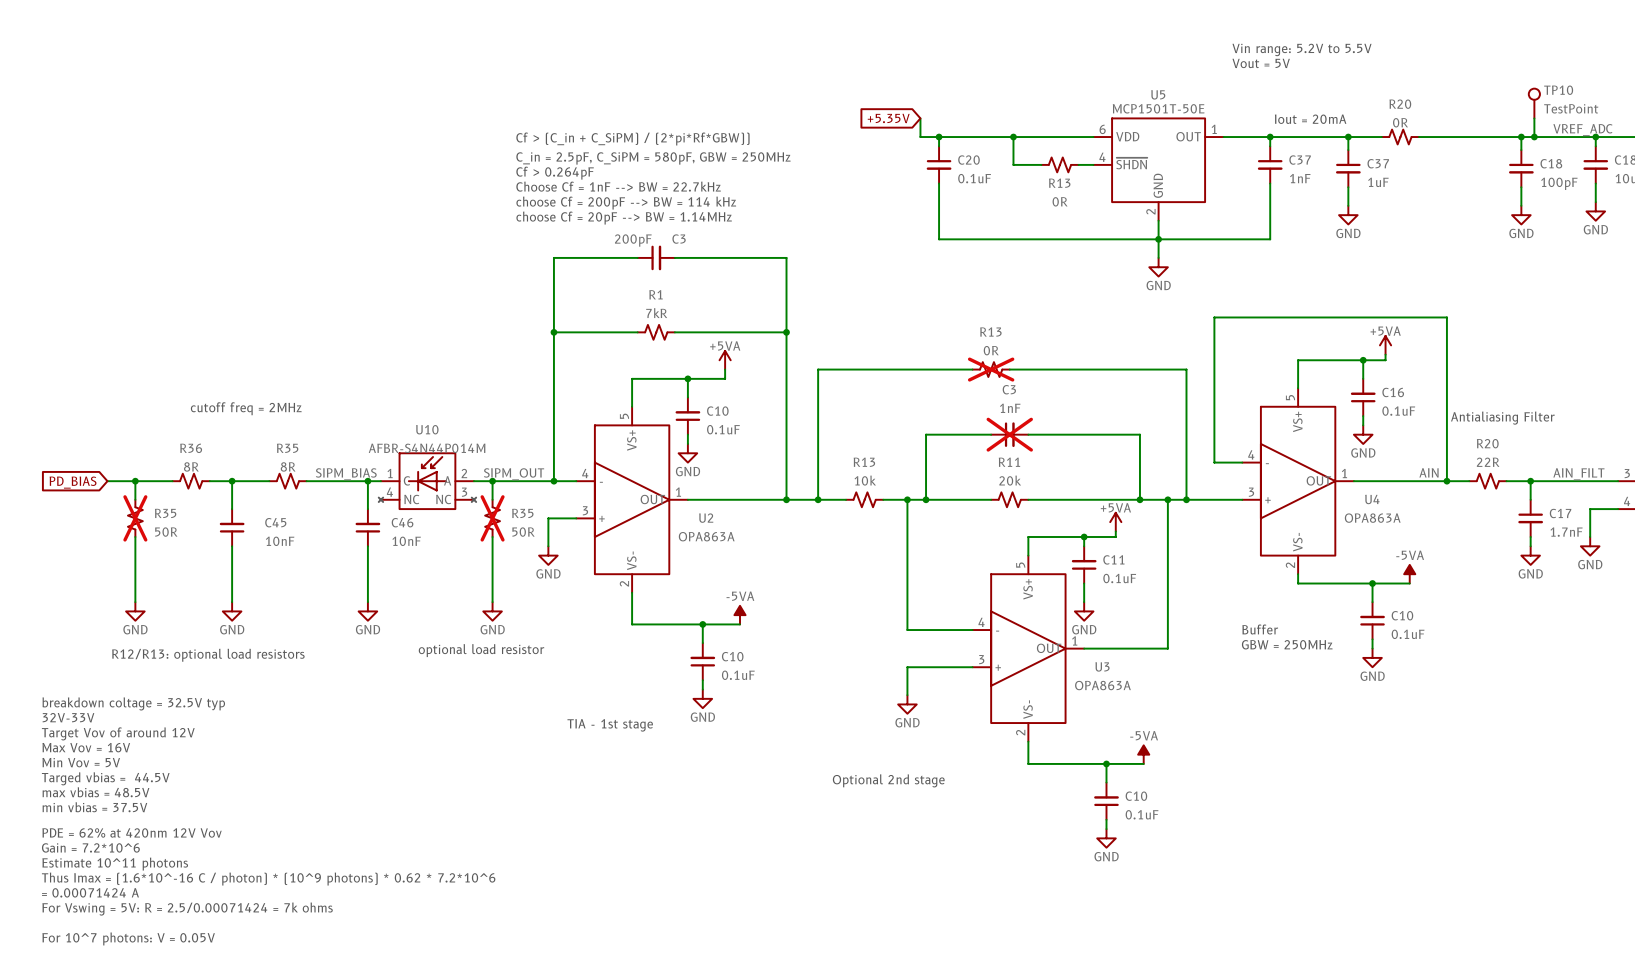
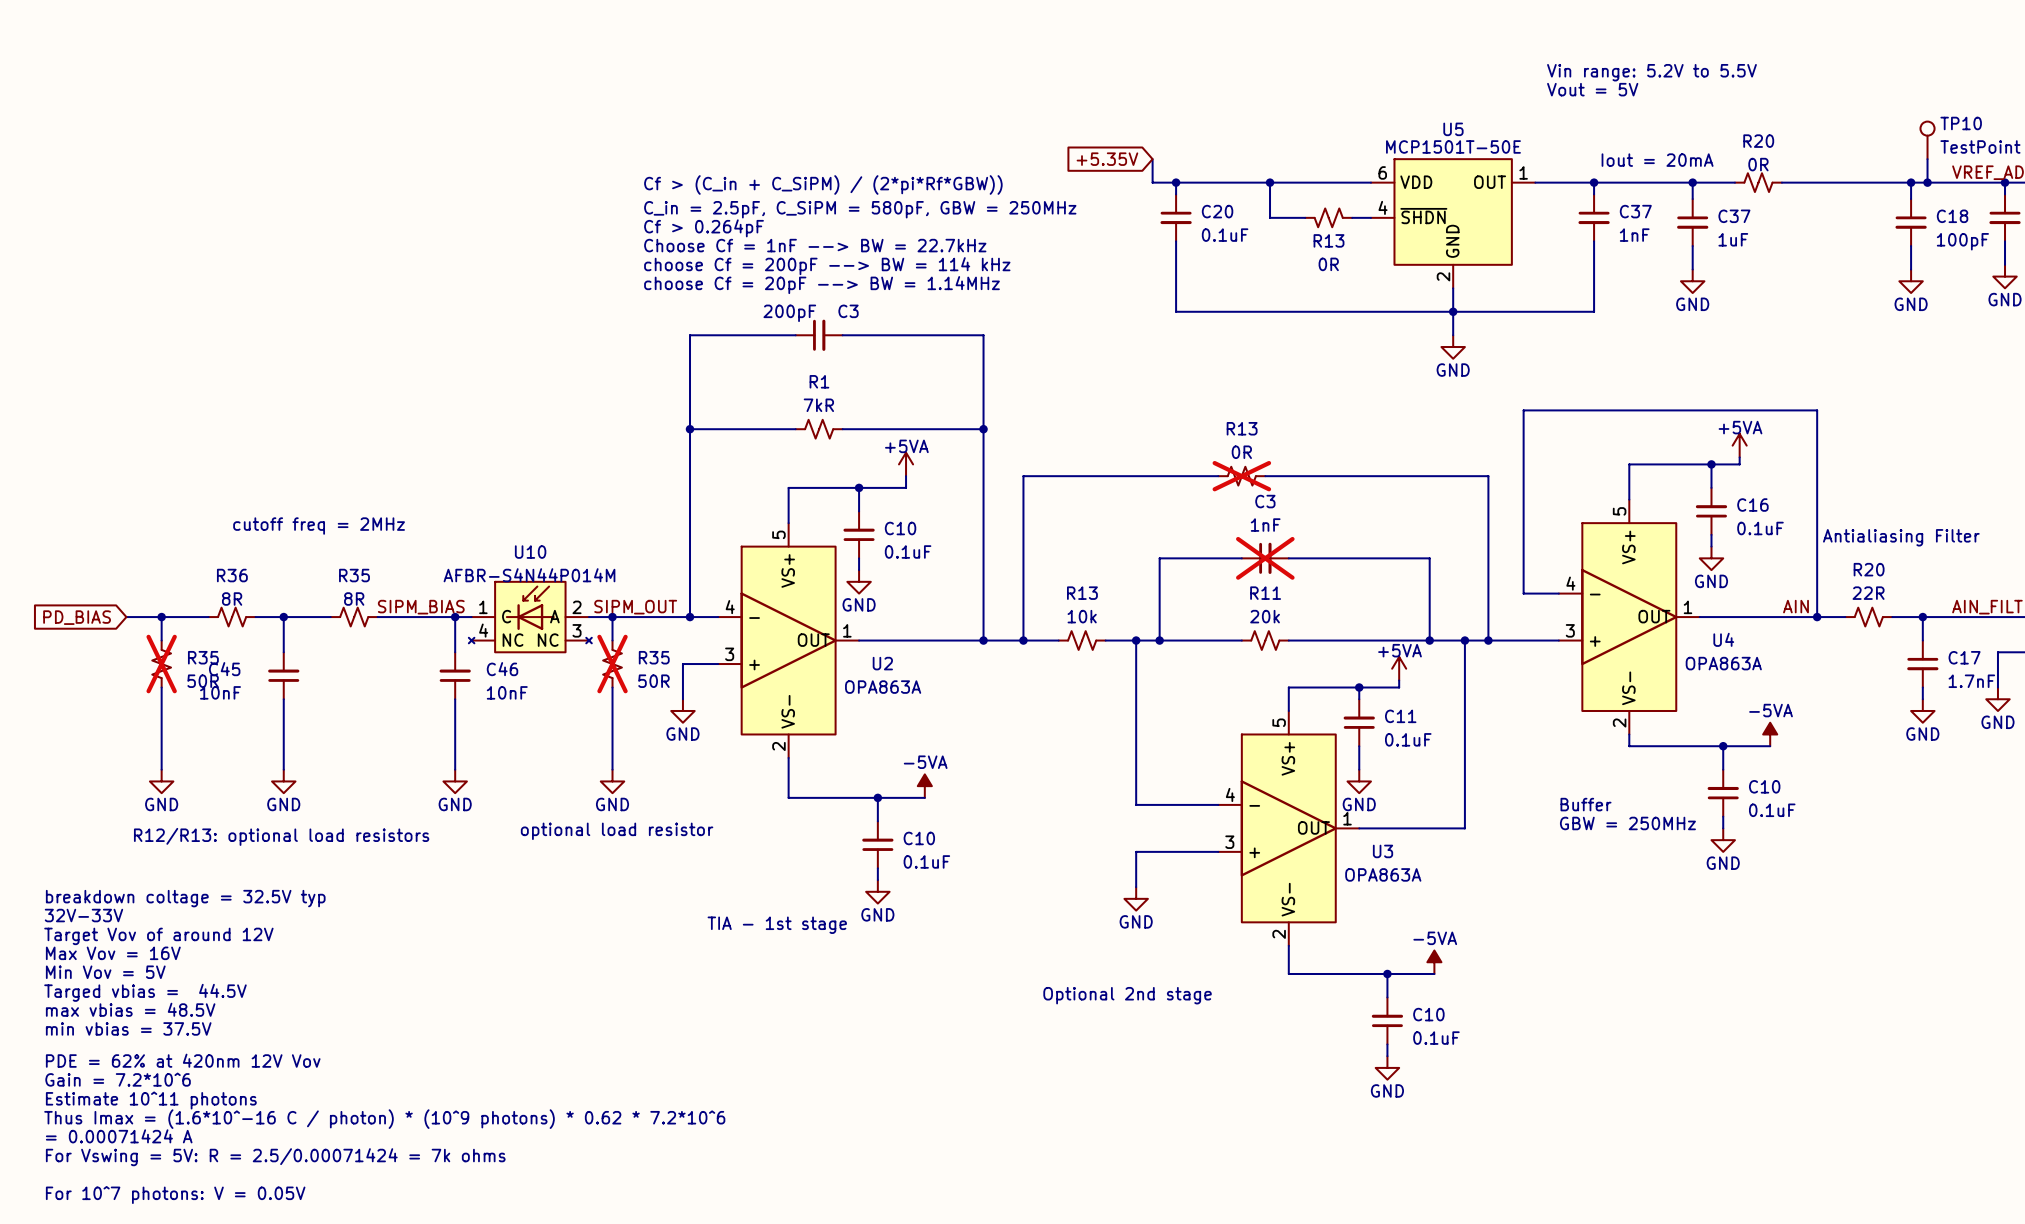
R13 flip: as is (1059, 164) -> left-right (1328, 217)
C45 name position: C45 (275, 522) -> C45 (224, 669)
C45 value position: 10nF (280, 541) -> 10nF (220, 692)

